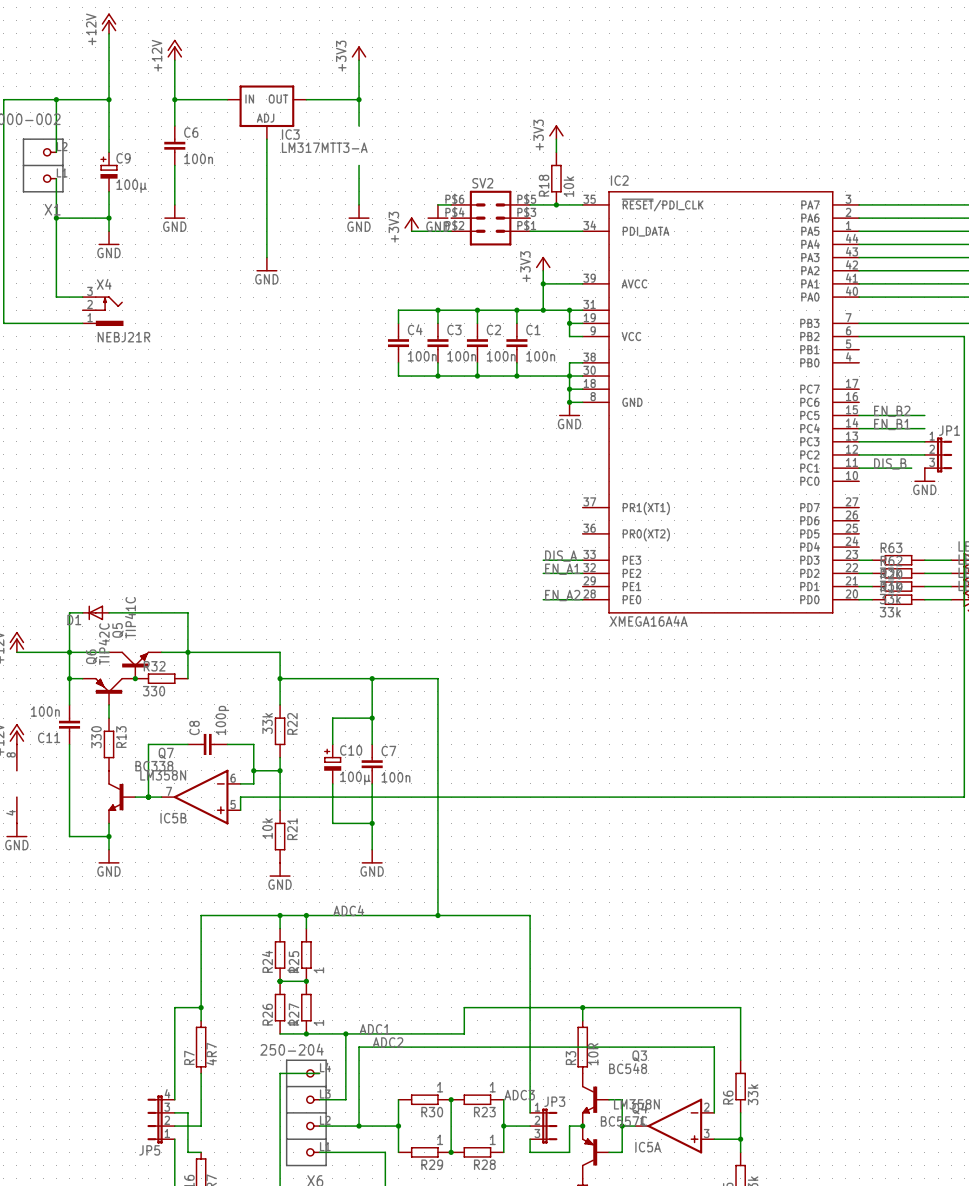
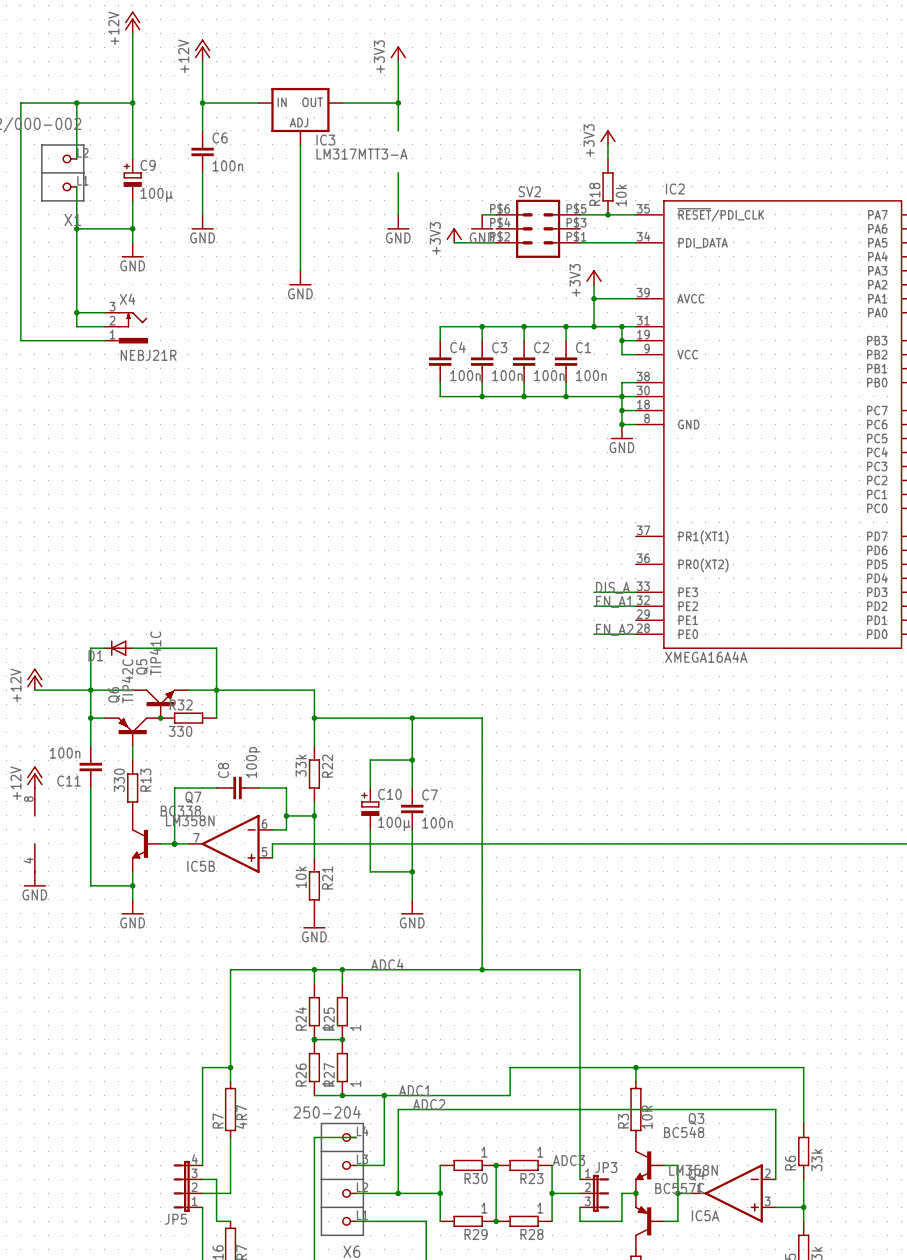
wire: none -> (76, 312) (76, 326) (104, 326)
junction: none -> (76, 312)

